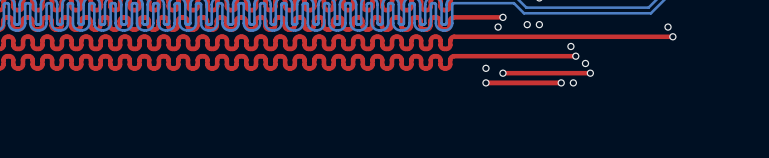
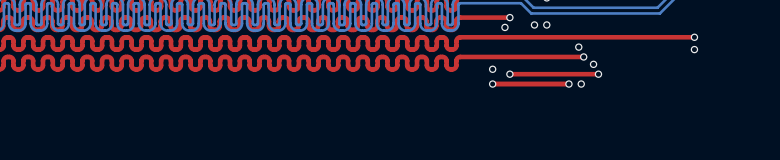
via: (668, 27) -> none
via: (672, 36) -> none
top track: none -> (694, 37) (682, 37)
via: none -> (694, 37)
via: none -> (694, 49)

